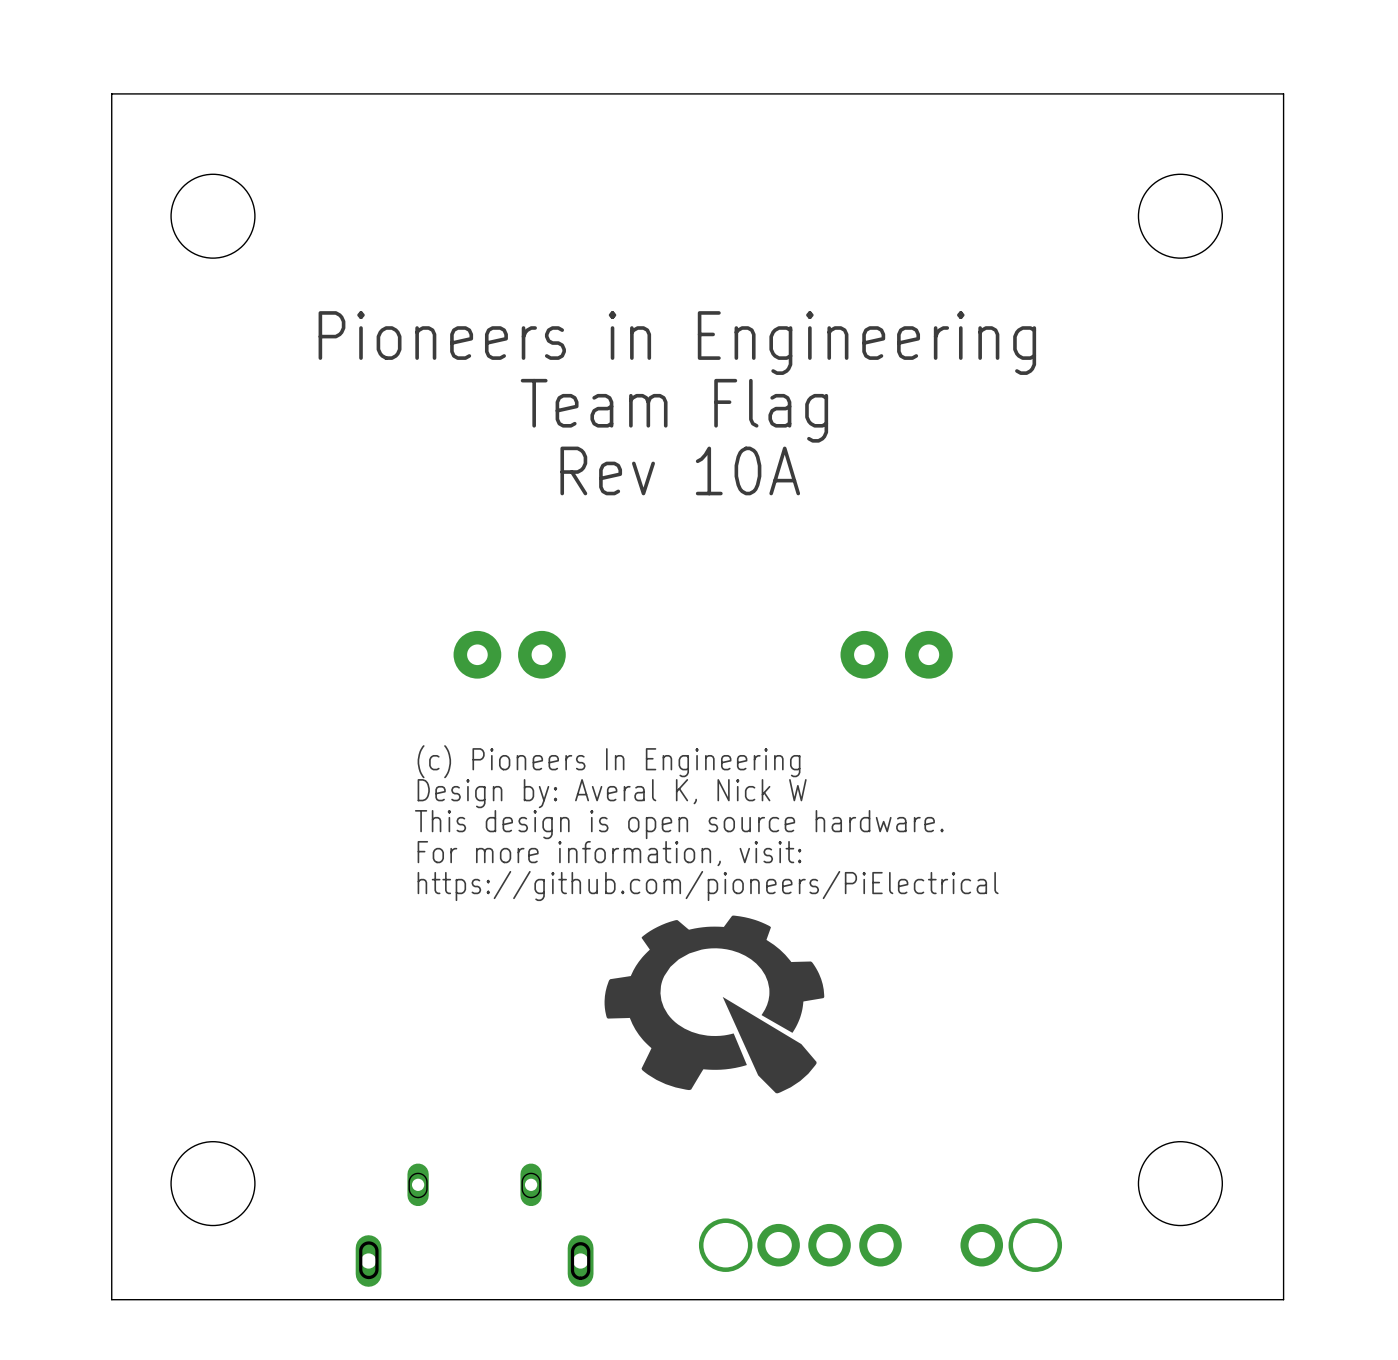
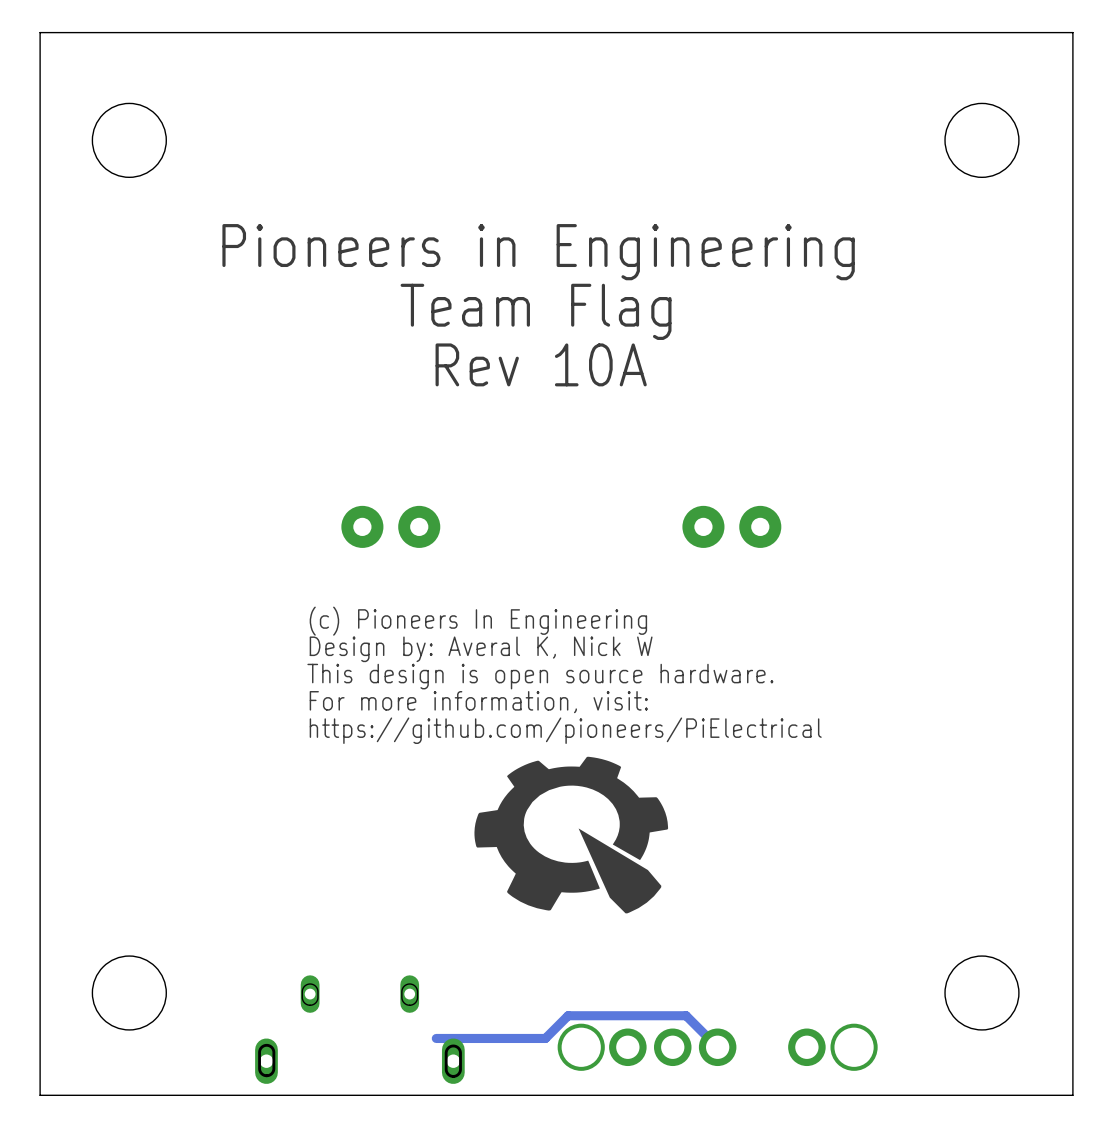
track: none -> (436, 1038) (545, 1038) (568, 1015) (686, 1015) (717, 1047)

